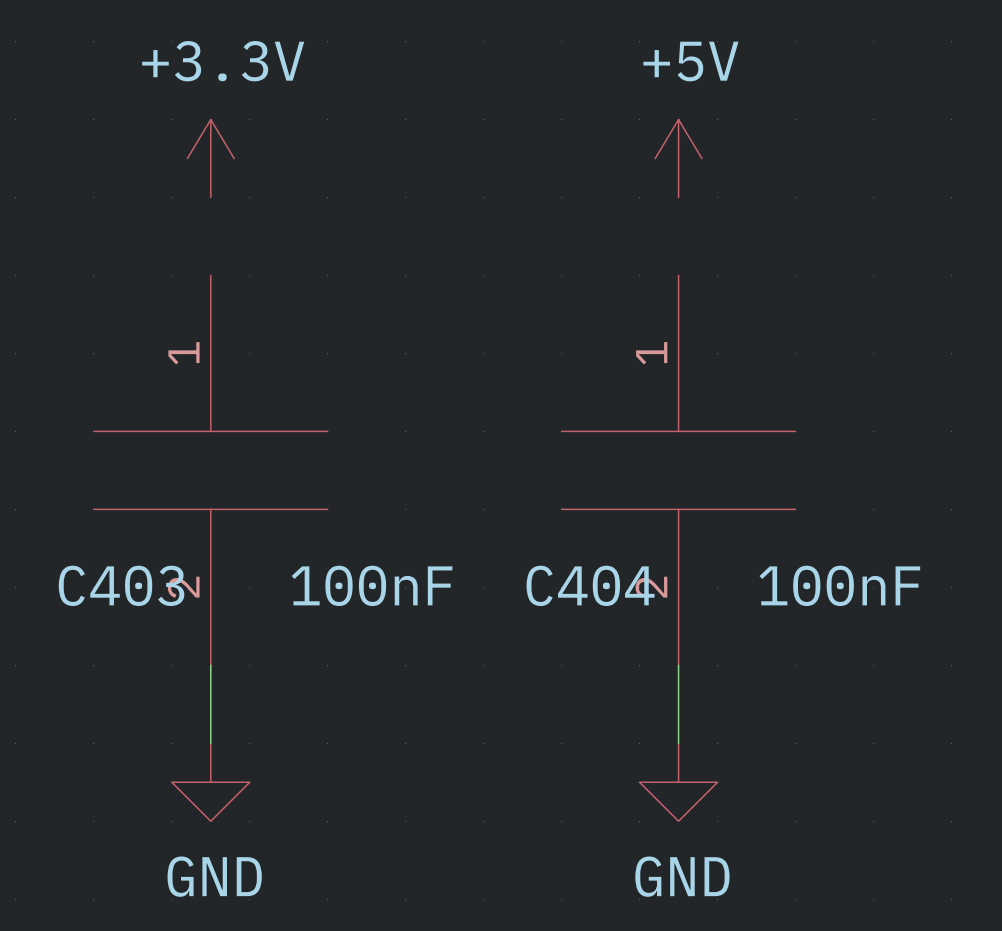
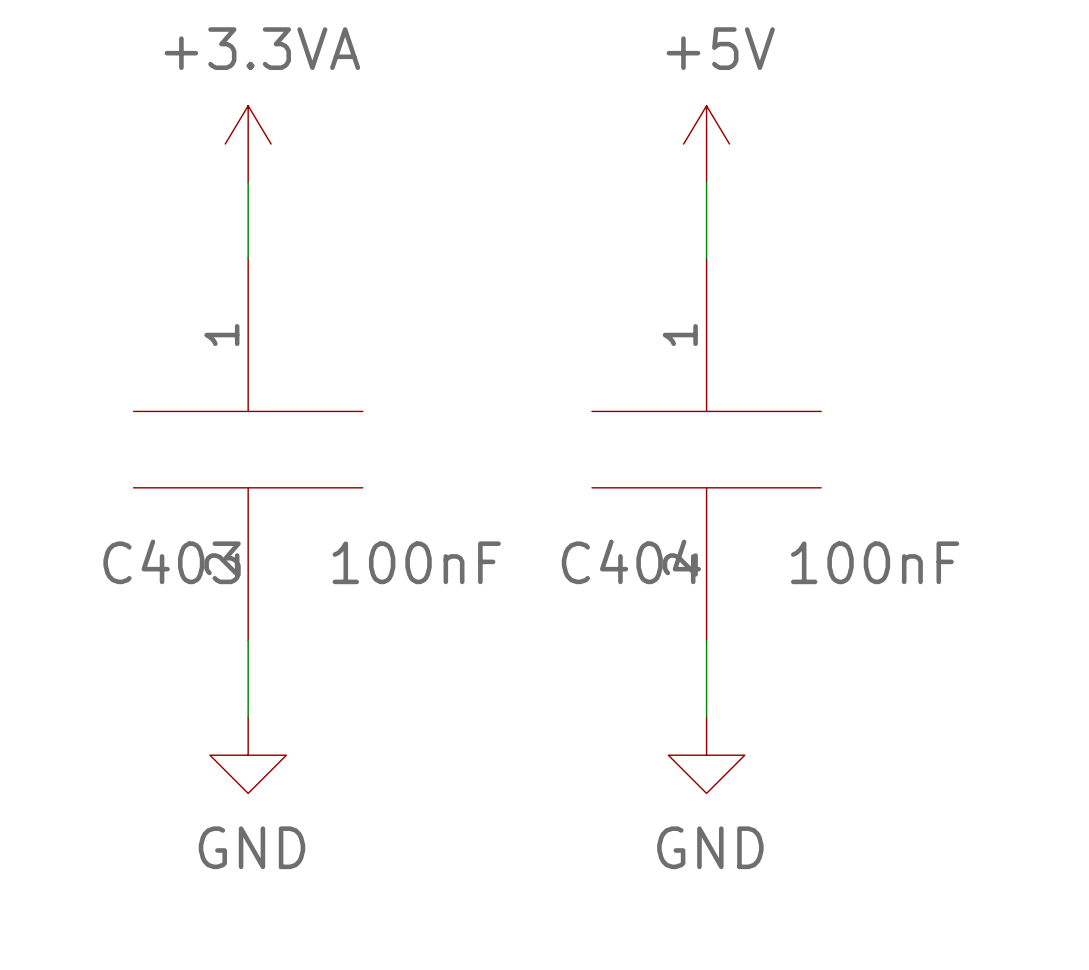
power symbol: +3.3V (210, 158) -> +3.3VA (248, 144)
wire: none -> (248, 182) (248, 258)
wire: none -> (706, 182) (706, 258)

